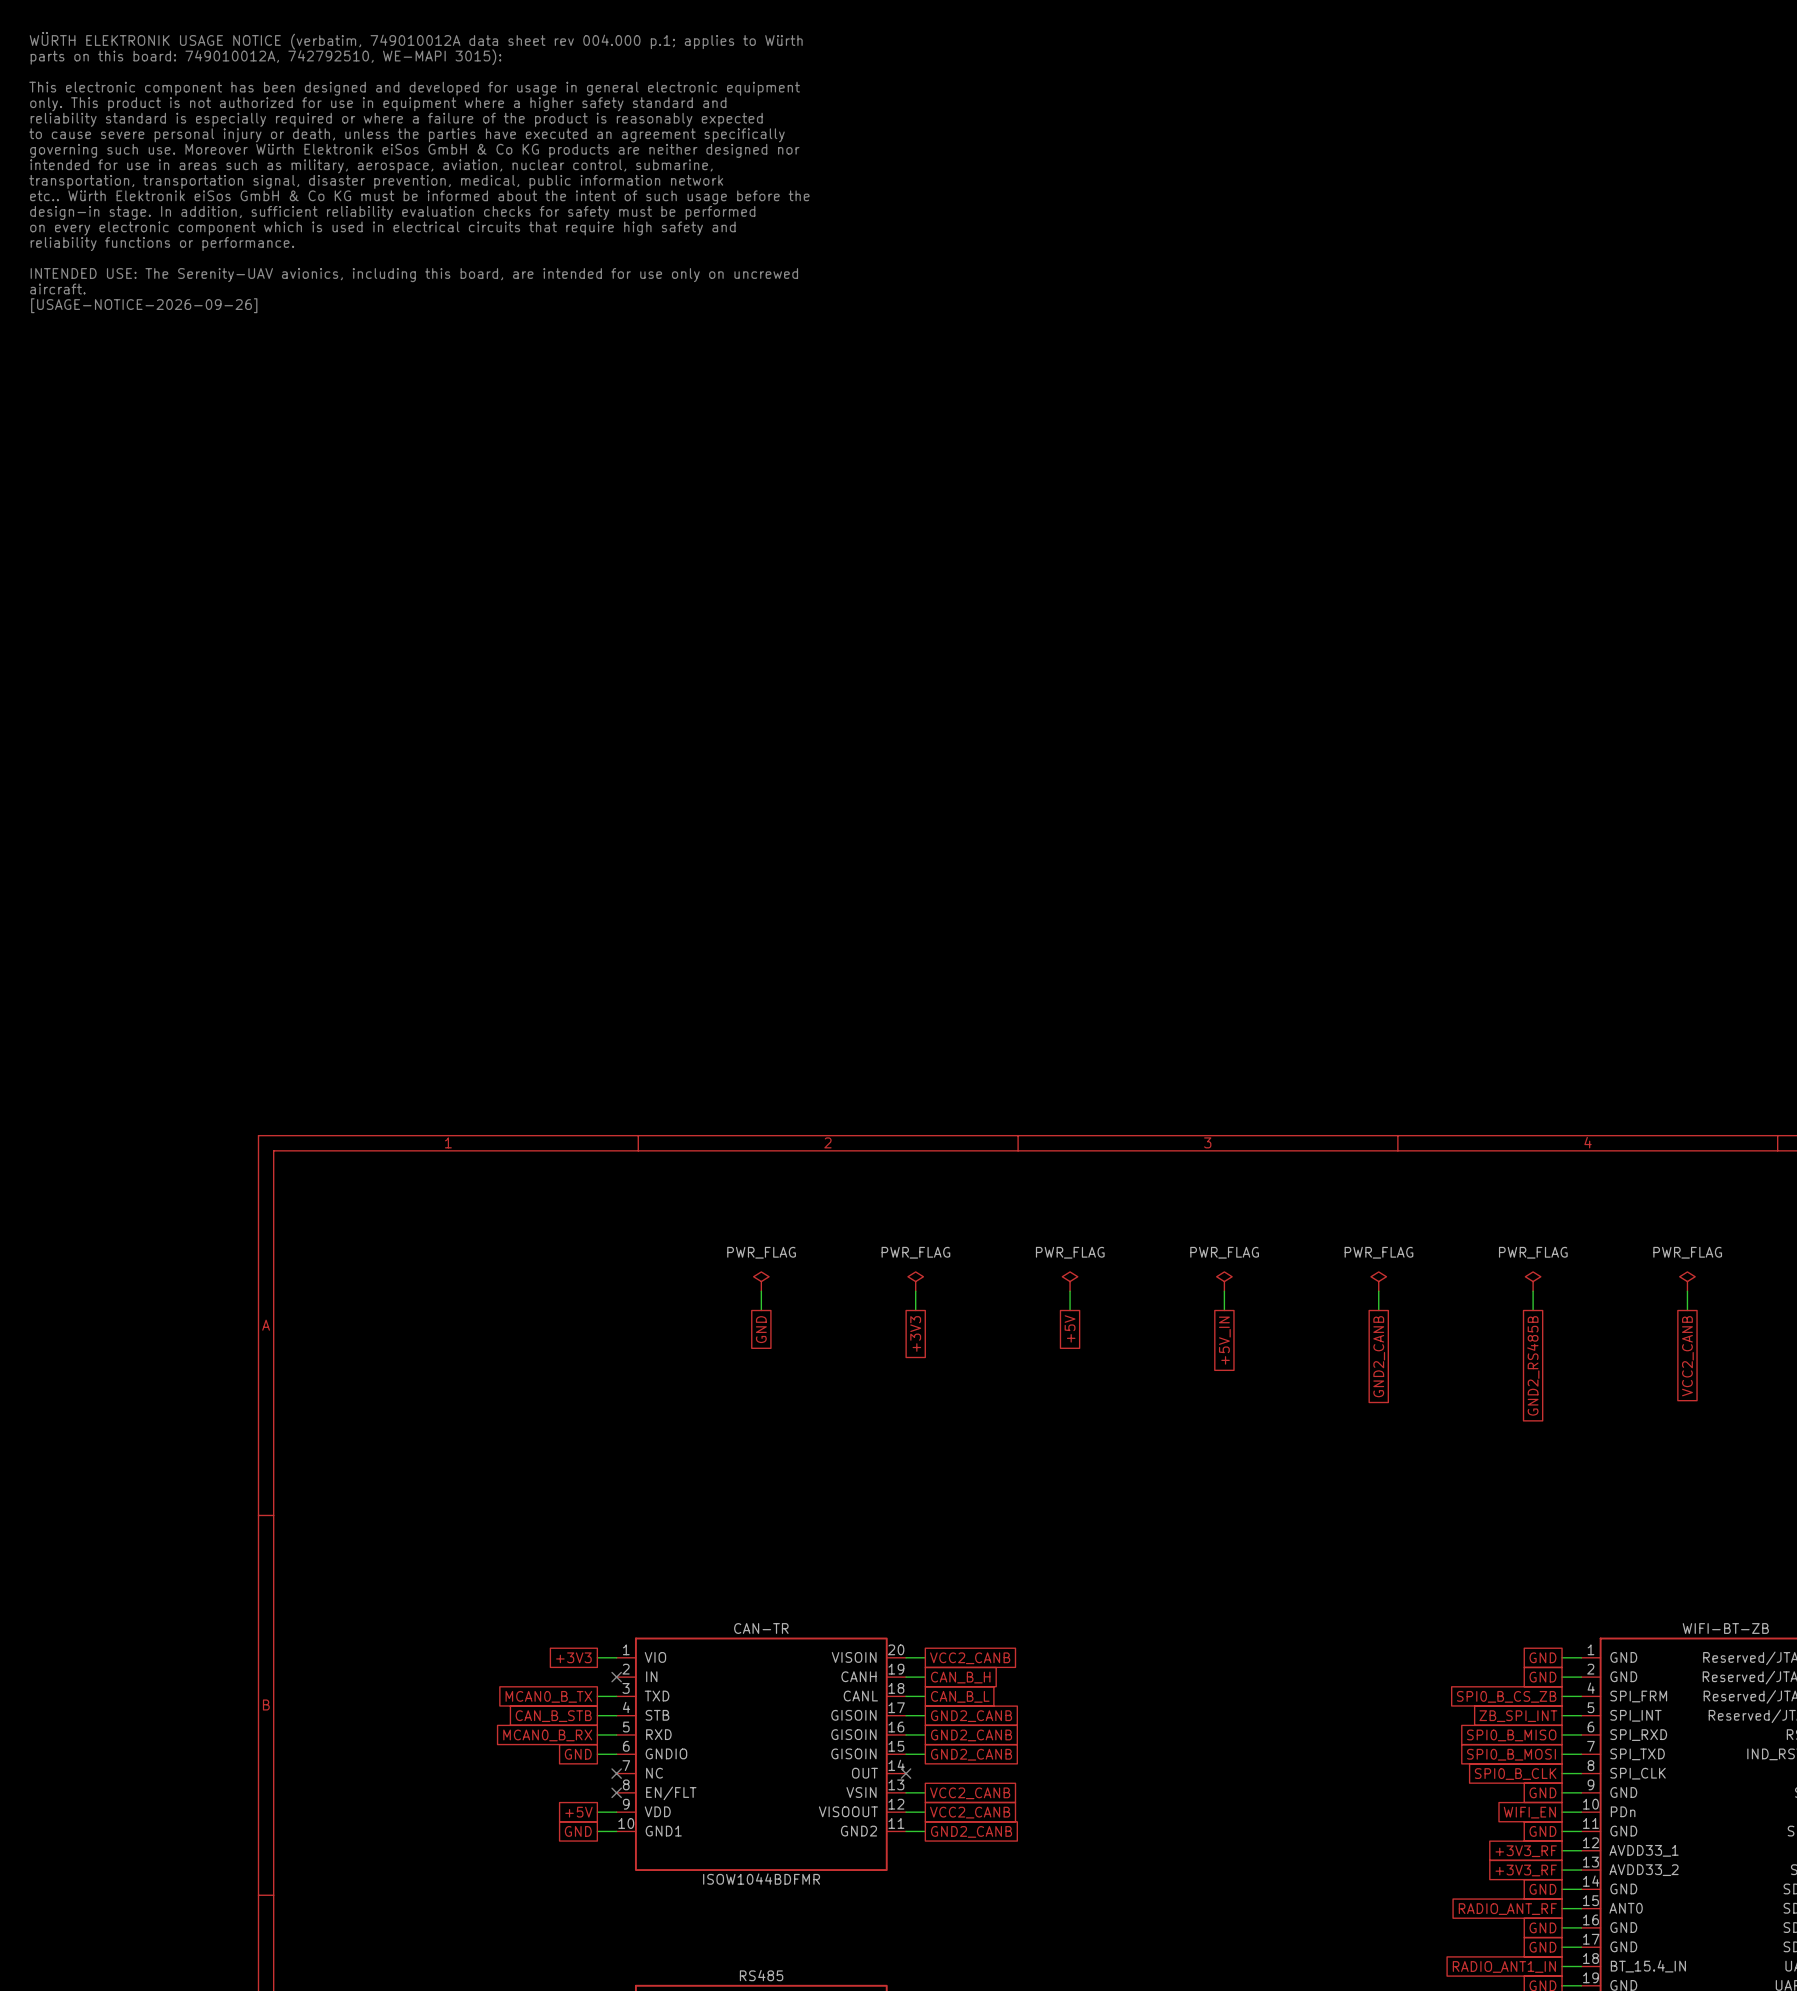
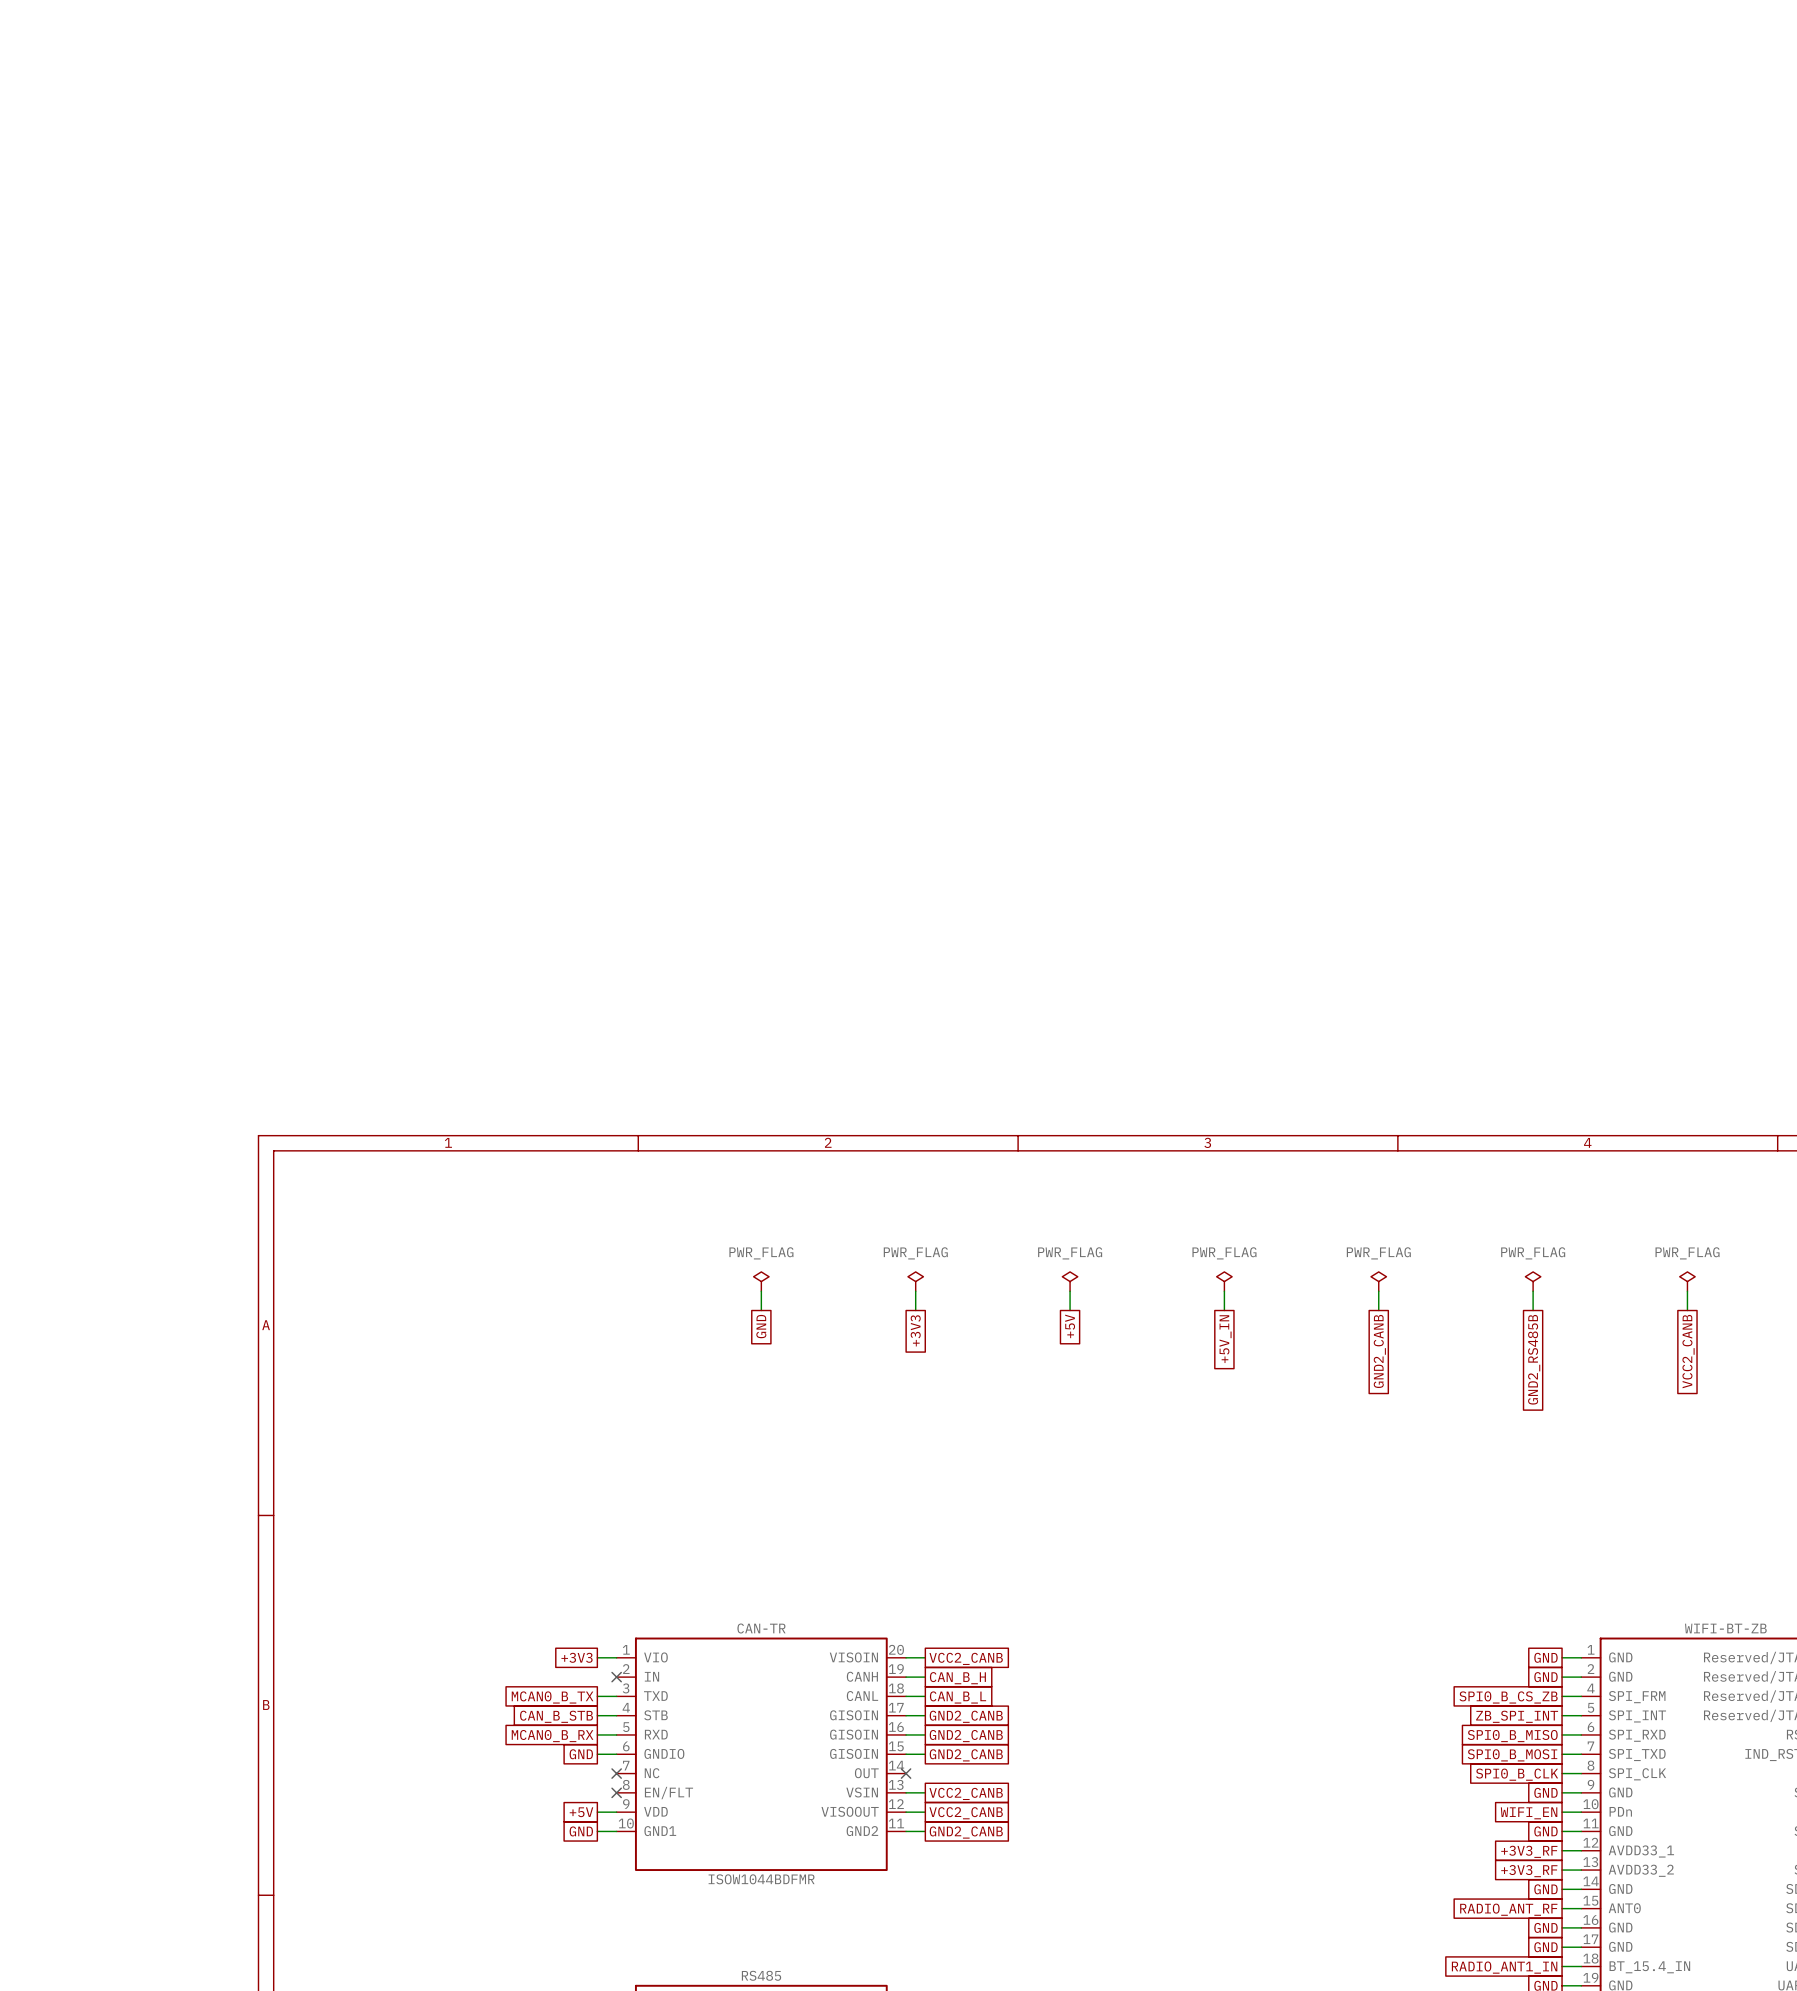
text: WÜRTH ELEKTRONIK USAGE NOTICE (verbatim, 749010012A data sheet rev 004.000 p.1; applies to Würth (416, 40) -> none
text: parts on this board: 749010012A, 742792510, WE-MAPI 3015): (265, 57) -> none
text: This electronic component has been designed and developed for usage in general electronic equipment (414, 88) -> none
text: only. This product is not authorized for use in equipment where a higher safety standard and (378, 104) -> none
text: reliability standard is especially required or where a failure of the product is reasonably expected (396, 119) -> none
text: to cause severe personal injury or death, unless the parties have executed an agreement specifically (407, 135) -> none
text: governing such use. Moreover Würth Elektronik eiSos GmbH & Co KG products are neither designed nor (414, 150) -> none
text: intended for use in areas such as military, aerospace, aviation, nuclear control, submarine, (371, 166) -> none
text: transportation, transportation signal, disaster prevention, medical, public information network (376, 181) -> none
text: etc.. Würth Elektronik eiSos GmbH & Co KG must be informed about the intent of such usage before the (419, 197) -> none
text: design-in stage. In addition, sufficient reliability evaluation checks for safety must be performed (392, 212) -> none
text: on every electronic component which is used in electrical circuits that require high safety and (382, 228) -> none
text: reliability functions or performance. (162, 244) -> none
text: INTENDED USE: The Serenity-UAV avionics, including this board, are intended for use only on uncrewed (414, 275) -> none
text: aircraft. (57, 289) -> none
text: [USAGE-NOTICE-2026-09-26] (144, 305) -> none

